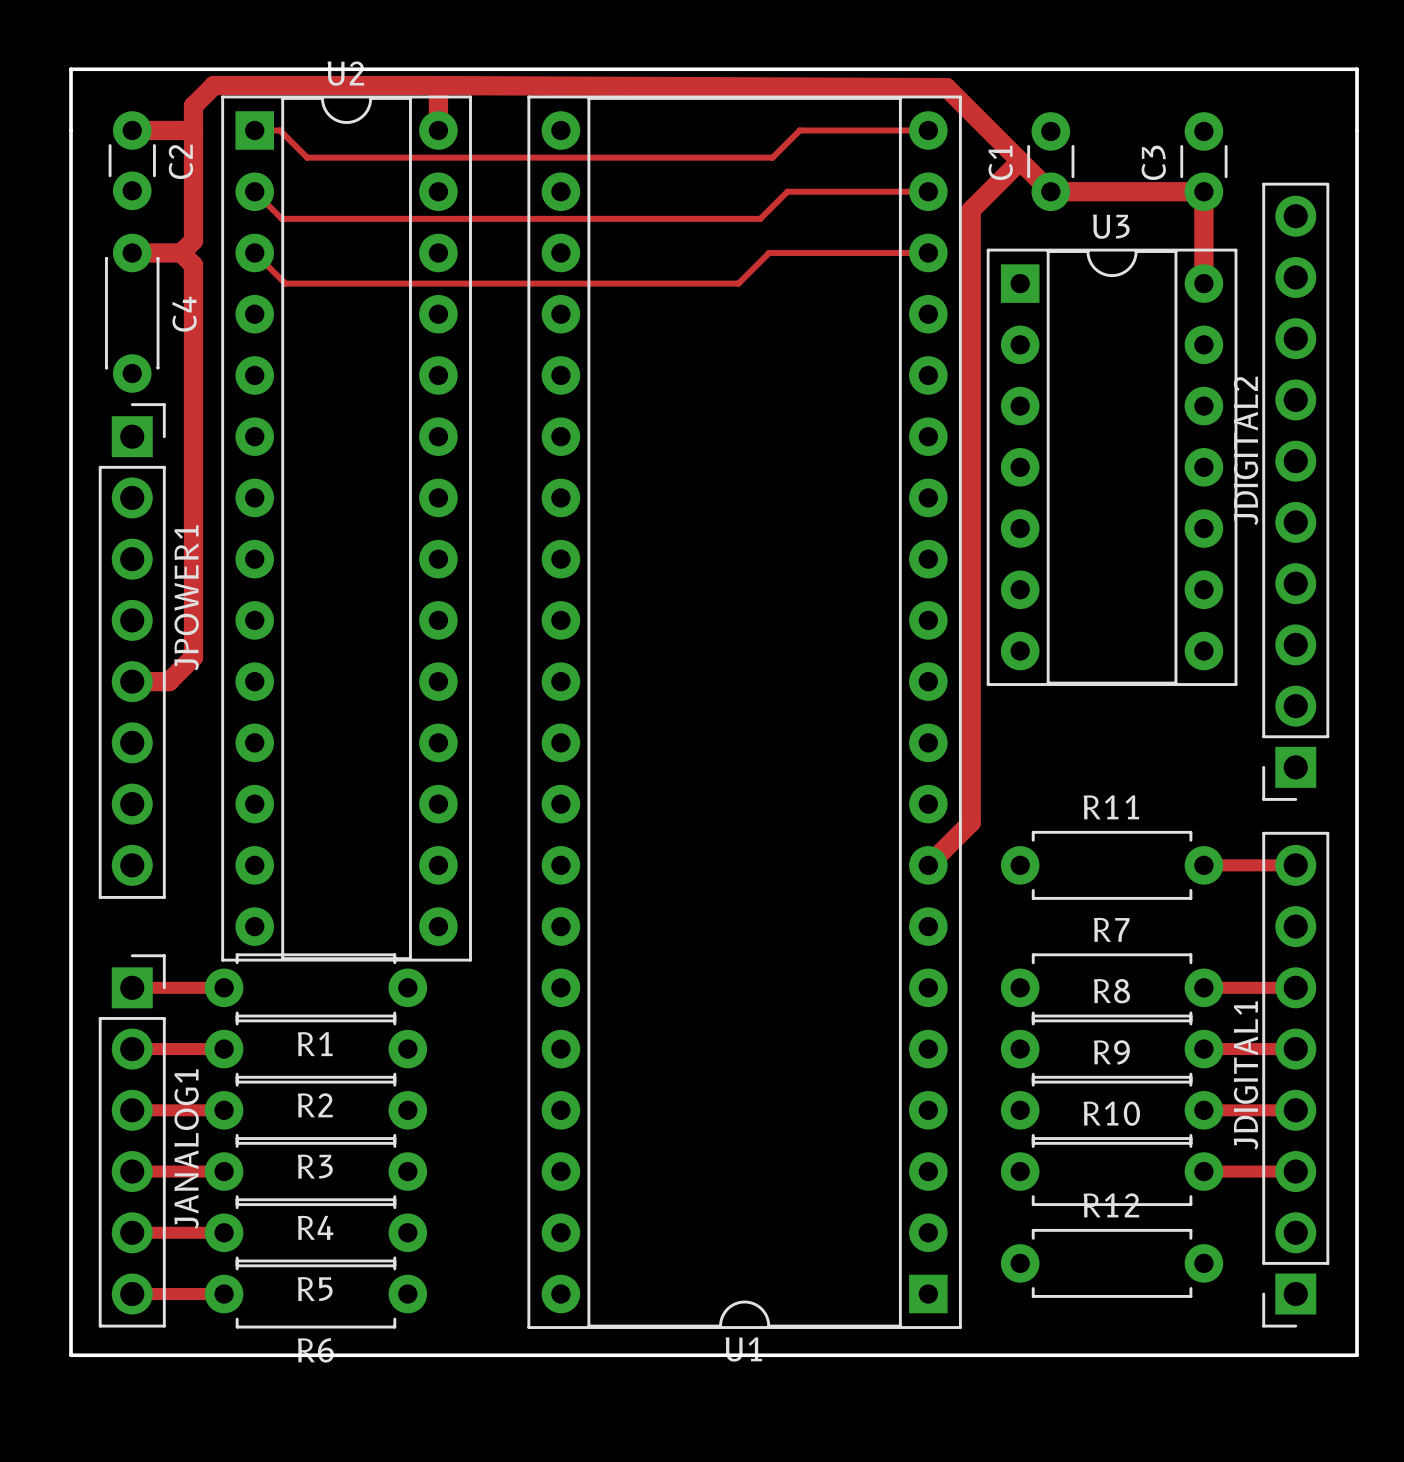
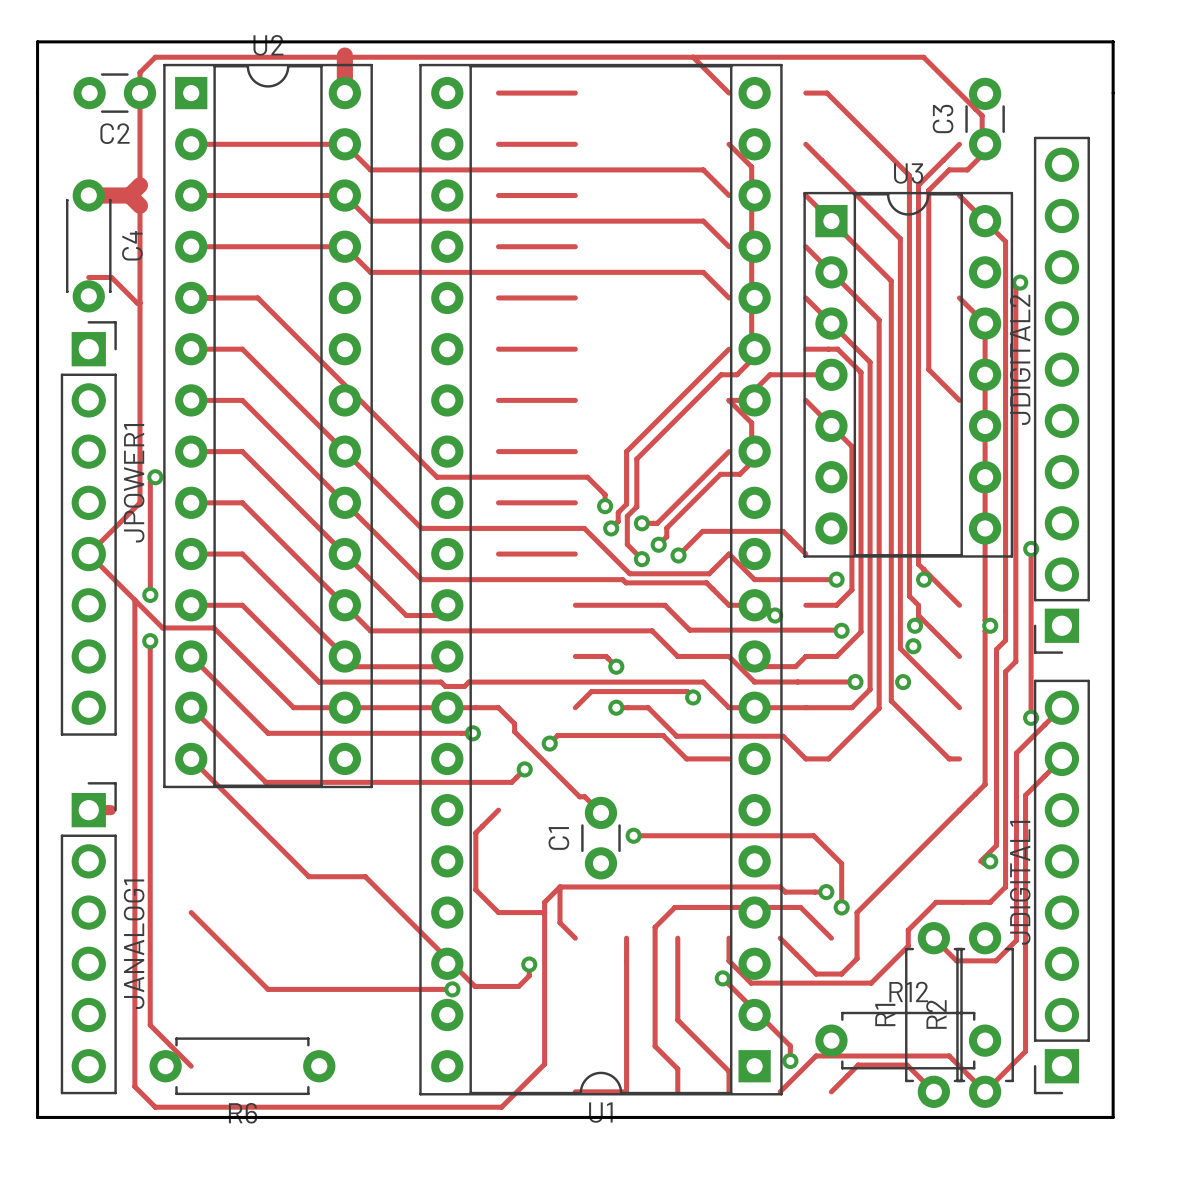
track: (211, 87) (213, 85) (946, 87) (1050, 191) (1203, 191) (1203, 283) -> (155, 57) (923, 57) (982, 115) (982, 155) (967, 169) (949, 169) (928, 190) (928, 369) (959, 400)
track width: thick (211, 87) (193, 106) (193, 240) -> thin (155, 57) (139, 72) (139, 185)
track: none -> (693, 57) (729, 93)
track: (132, 130) (193, 130) -> none
track: (254, 130) (280, 130) (307, 157) (772, 157) (799, 130) (928, 130) -> none
track: none -> (498, 93) (575, 93)
track: none -> (805, 93) (827, 93) (909, 175) (909, 596) (918, 605) (918, 622) (914, 625)
C2 rotation: 0° (132, 160) -> 90° clockwise (114, 93)
track: (1020, 161) (971, 210) (971, 822) (928, 865) -> none
C1 position: (1050, 161) -> (600, 838)
track: (254, 191) (281, 218) (760, 218) (787, 191) (928, 191) -> (191, 144) (344, 144) (370, 169) (703, 169) (729, 195)
track: none -> (498, 144) (575, 144)
track: none -> (729, 144) (751, 166) (751, 360) (736, 374) (721, 374) (636, 459) (636, 506) (627, 516) (627, 544) (641, 559)
track: none -> (805, 144) (900, 238) (900, 648) (959, 707)
track: none -> (959, 144) (918, 185) (918, 564) (959, 605)
track: (254, 252) (285, 283) (469, 283) -> (191, 195) (344, 195) (370, 221)
track: none -> (498, 195) (575, 195)
track: (928, 252) (769, 252) (738, 283) -> (729, 246) (703, 221) (595, 221)
track: none -> (805, 195) (891, 280) (891, 700) (949, 758) (959, 758)
track: none -> (959, 195) (1005, 241) (1005, 640) (996, 649) (996, 845) (980, 861)
track width: thick (193, 265) (193, 620) -> thin (139, 205) (139, 502)
track: none -> (191, 246) (344, 246) (370, 272) (703, 272) (729, 297)
track: none -> (498, 246) (575, 246)
track: none -> (805, 246) (879, 320) (879, 708) (828, 758) (805, 758) (783, 736) (676, 736) (648, 707) (616, 707)
track: none -> (88, 277) (111, 277) (137, 303) (139, 303)
track: none -> (1020, 282) (1015, 286) (1015, 661) (1005, 671) (1005, 886) (990, 902) (936, 902) (908, 930) (908, 946) (871, 983) (751, 983) (729, 961) (729, 938)
via: none -> (1020, 282)
track: none -> (186, 297) (257, 297) (437, 477) (587, 477) (605, 494) (605, 506)
track: none -> (498, 297) (575, 297)
track: none -> (805, 297) (870, 362) (870, 689) (851, 707) (729, 707) (703, 682) (468, 682) (464, 686) (445, 686) (441, 682) (319, 682) (242, 605) (191, 605)
track: none -> (959, 297) (985, 323) (985, 620) (990, 625) (985, 630) (985, 784) (857, 912) (857, 958) (841, 974) (816, 974) (780, 938)
track: none -> (191, 349) (242, 349) (421, 528) (584, 528) (629, 573) (709, 573) (729, 554) (754, 579) (836, 579)
track: none -> (498, 349) (575, 349)
track: none -> (729, 349) (626, 451) (626, 504) (618, 512) (618, 521) (611, 528)
track: none -> (805, 349) (837, 349) (861, 372) (861, 632) (836, 656) (805, 656) (795, 666) (759, 666)
track: none -> (841, 374) (769, 374) (744, 400) (729, 400) (751, 423) (751, 462) (739, 474) (720, 474) (666, 528) (666, 536) (658, 544)
track: none -> (191, 400) (242, 400) (421, 579) (622, 579) (626, 582) (706, 582) (729, 605) (764, 605) (775, 615)
track: none -> (498, 400) (575, 400)
track: none -> (805, 400) (851, 446) (851, 589) (836, 605) (805, 605)
track: none -> (191, 451) (242, 451) (406, 615) (452, 615)
track: none -> (498, 451) (575, 451)
track: none -> (729, 451) (657, 523) (641, 523)
track: none -> (155, 477) (150, 482) (150, 594)
via: none -> (155, 477)
track: (193, 620) (193, 657) (169, 681) (132, 681) -> (139, 502) (88, 554) (162, 627) (213, 627) (293, 707) (498, 707) (514, 723) (514, 731) (579, 796) (584, 796) (600, 812)
track: none -> (191, 502) (242, 502) (370, 630) (652, 630) (677, 656) (729, 656) (754, 682) (855, 682)
track: none -> (498, 502) (575, 502)
via: none -> (605, 506)
via: none -> (641, 523)
via: none -> (611, 528)
via: none -> (658, 544)
track: none -> (1031, 549) (1031, 717)
via: none -> (1031, 548)
track: none -> (191, 554) (242, 554) (355, 666) (452, 666)
track: none -> (498, 554) (575, 554)
track: none -> (805, 554) (783, 531) (702, 531) (678, 555)
via: none -> (678, 555)
via: none -> (641, 559)
via: none -> (836, 579)
via: none -> (924, 579)
via: none -> (150, 594)
track: none -> (134, 600) (134, 1086) (155, 1107) (501, 1107) (544, 1064) (544, 902) (559, 886)
track: none -> (575, 605) (664, 605) (689, 630) (841, 630)
via: none -> (775, 615)
track: none -> (918, 615) (959, 656)
via: none -> (914, 625)
via: none -> (990, 625)
via: none -> (841, 630)
track: none -> (150, 641) (150, 1025) (191, 1066)
via: none -> (150, 641)
via: none -> (913, 646)
track: none -> (191, 656) (268, 733) (472, 733)
track: none -> (575, 656) (606, 656) (616, 666)
via: none -> (616, 666)
via: none -> (855, 682)
via: none -> (903, 682)
track: none -> (693, 697) (687, 691) (591, 691) (575, 707)
via: none -> (693, 697)
track: none -> (191, 707) (265, 782) (511, 782) (524, 769)
via: none -> (616, 707)
R11: (1112, 865) -> none
track: (1203, 865) (1295, 865) -> (933, 938) (956, 960) (995, 960) (1016, 940) (1016, 753) (1061, 707)
via: none -> (1031, 717)
via: none -> (472, 733)
track: none -> (549, 743) (557, 735) (663, 735) (686, 758) (729, 758)
via: none -> (549, 743)
track: none -> (191, 758) (309, 876) (365, 876) (475, 986) (518, 986) (529, 975) (529, 964)
track: none -> (1061, 758) (1025, 795) (1025, 1051) (985, 1091) (949, 1055) (816, 1055) (780, 1091)
via: none -> (524, 769)
track: (158, 987) (224, 987) -> none
R1 rotation: 0° (315, 987) -> 90° clockwise (933, 1015)
R1 position: (315, 987) -> (933, 1015)
track: none -> (498, 810) (475, 832) (475, 889) (498, 912) (544, 912)
R7: (1112, 987) -> none
track: (1203, 987) (1295, 987) -> none
track: none -> (633, 835) (813, 835) (841, 863) (841, 907)
via: none -> (633, 835)
track: (132, 1049) (224, 1049) -> none
R2 rotation: 0° (315, 1049) -> 90° clockwise (985, 1015)
R2 position: (315, 1049) -> (985, 1015)
R8: (1112, 1049) -> none
track: (1210, 1049) (1295, 1049) -> none
via: none -> (990, 861)
track: none -> (559, 886) (559, 922) (575, 938)
track: none -> (559, 886) (780, 886) (785, 892) (826, 892)
via: none -> (826, 892)
via: none -> (841, 907)
track: (132, 1110) (224, 1110) -> none
track: none -> (191, 912) (268, 989) (452, 989)
R3: (315, 1110) -> none
R9: (1112, 1110) -> none
track: (1203, 1110) (1295, 1110) -> none
track: none -> (626, 938) (626, 1091) (575, 1091)
track: none -> (677, 938) (677, 1020) (729, 1071) (729, 1091)
track: none -> (831, 938) (800, 907) (674, 907) (655, 927) (655, 1046) (677, 1069) (677, 1091)
track: (132, 1171) (224, 1171) -> none
R4: (315, 1171) -> none
R10: (1112, 1171) -> none
track: (1203, 1171) (1295, 1171) -> none
via: none -> (529, 964)
track: none -> (722, 978) (790, 1045) (790, 1061)
via: none -> (722, 978)
via: none -> (452, 989)
track: (132, 1232) (224, 1232) -> none
R5: (315, 1232) -> none
via: none -> (790, 1061)
track: (132, 1294) (224, 1294) -> none
track: none -> (831, 1091) (858, 1065) (907, 1065) (933, 1091)

